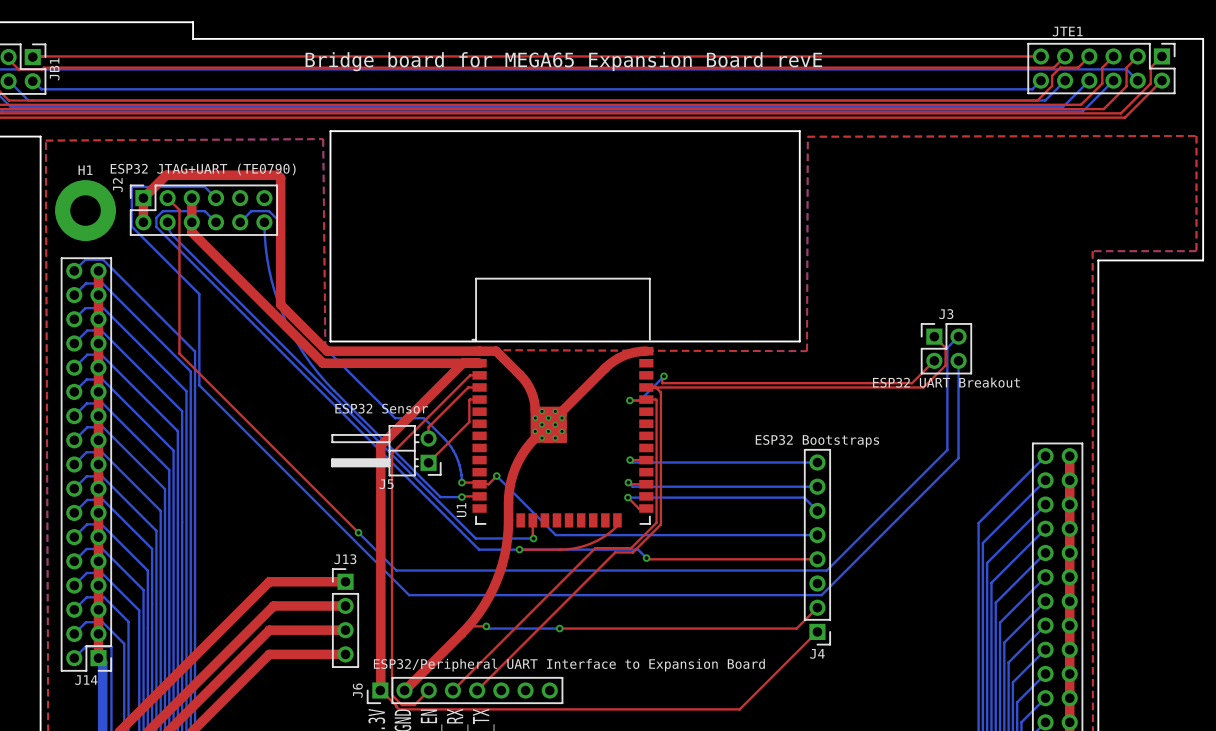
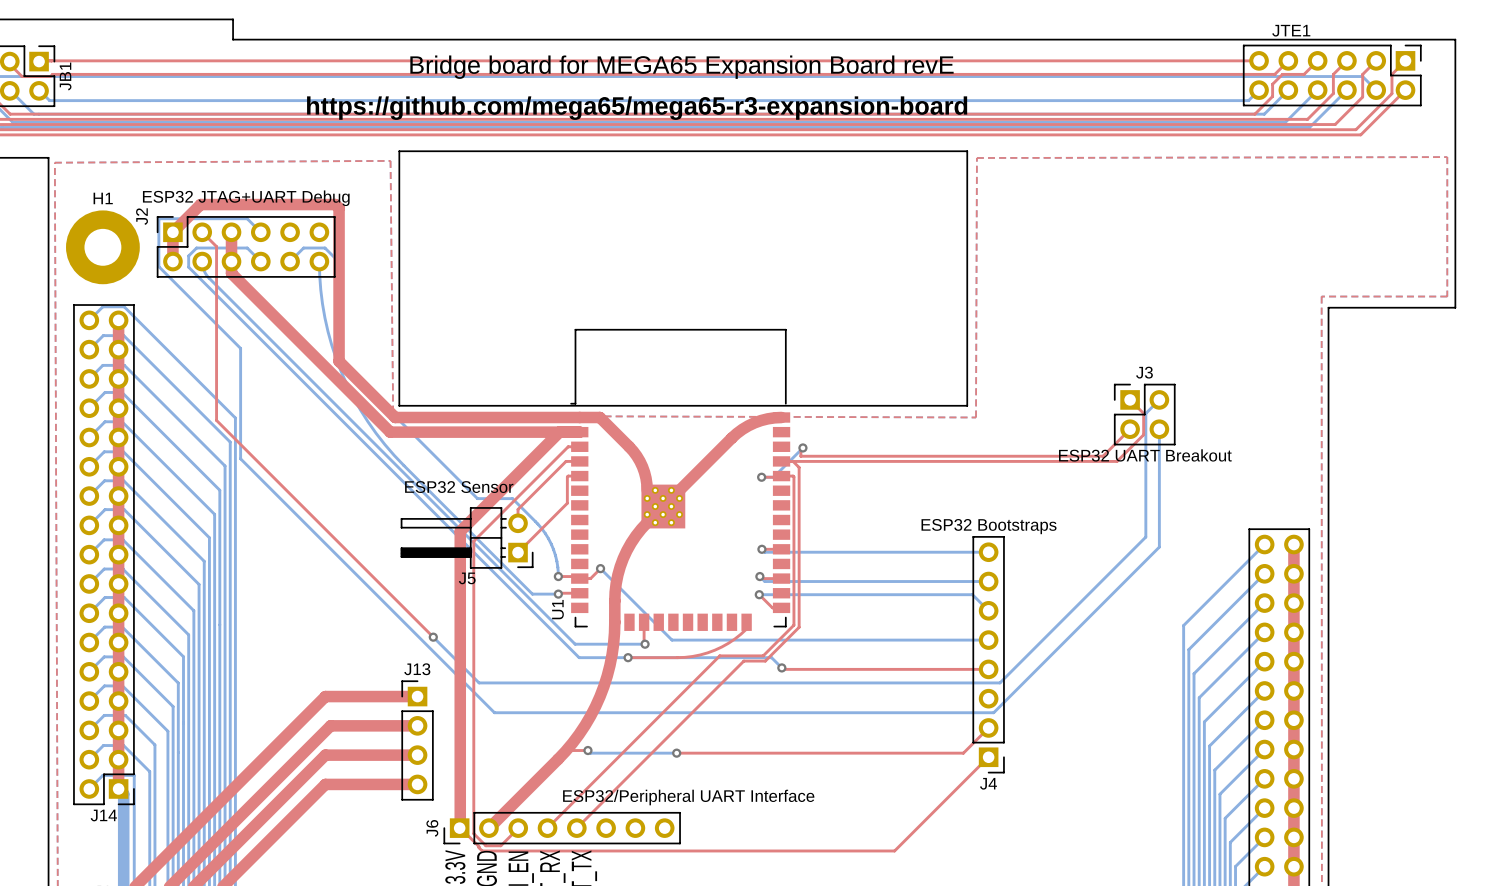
text: none -> https://github.com/mega65/mega65-r3-expansion-board (637, 108)
J2 value: ESP32 JTAG+UART (TE0790) (203, 169) -> ESP32 JTAG+UART Debug (246, 198)
J6 value: ESP32/Peripheral UART Interface to Expansion Board (569, 665) -> ESP32/Peripheral UART Interface (688, 797)

